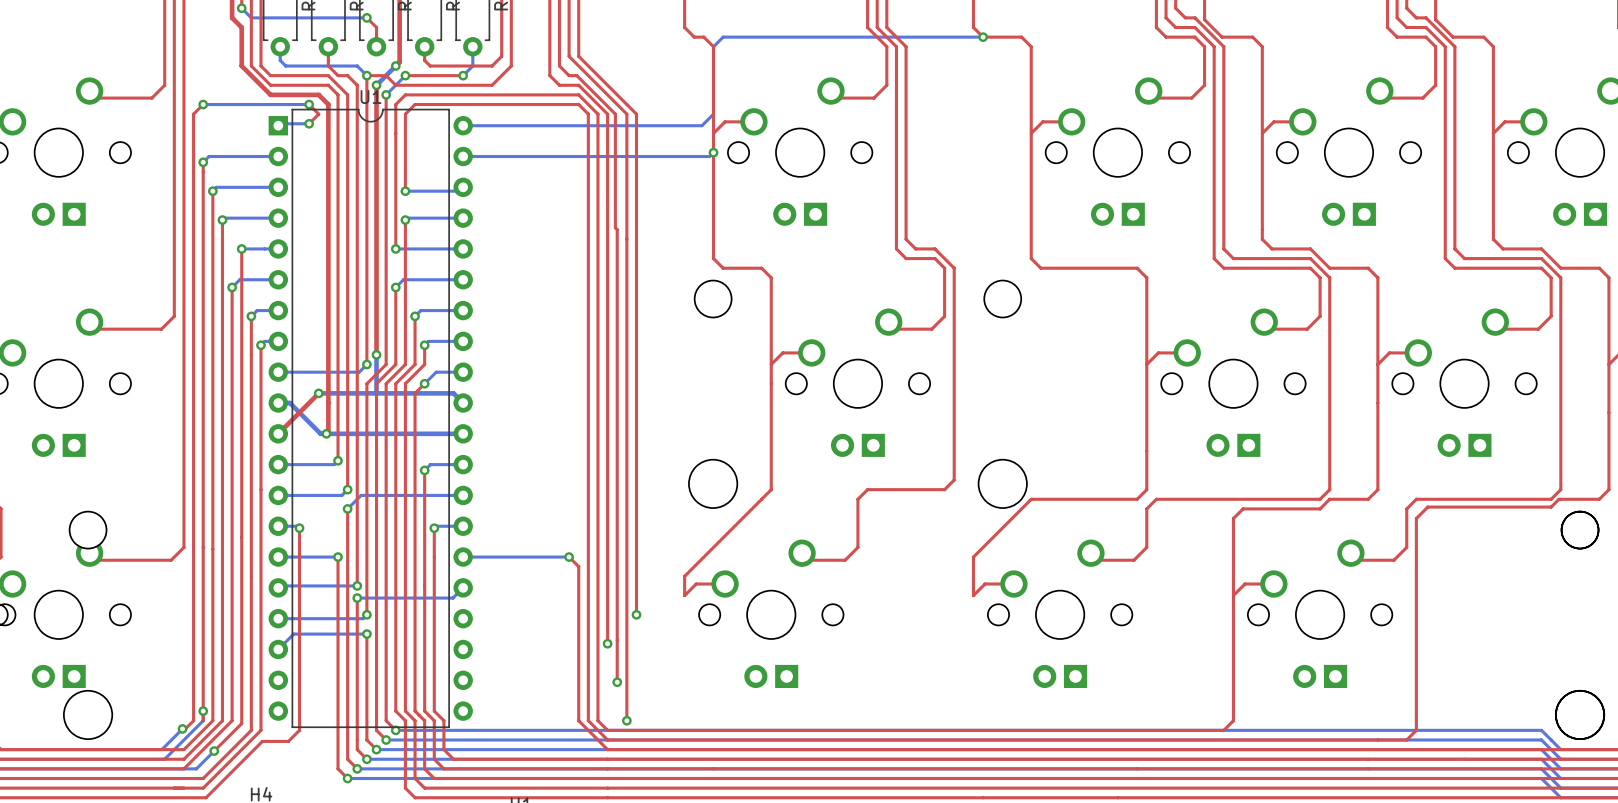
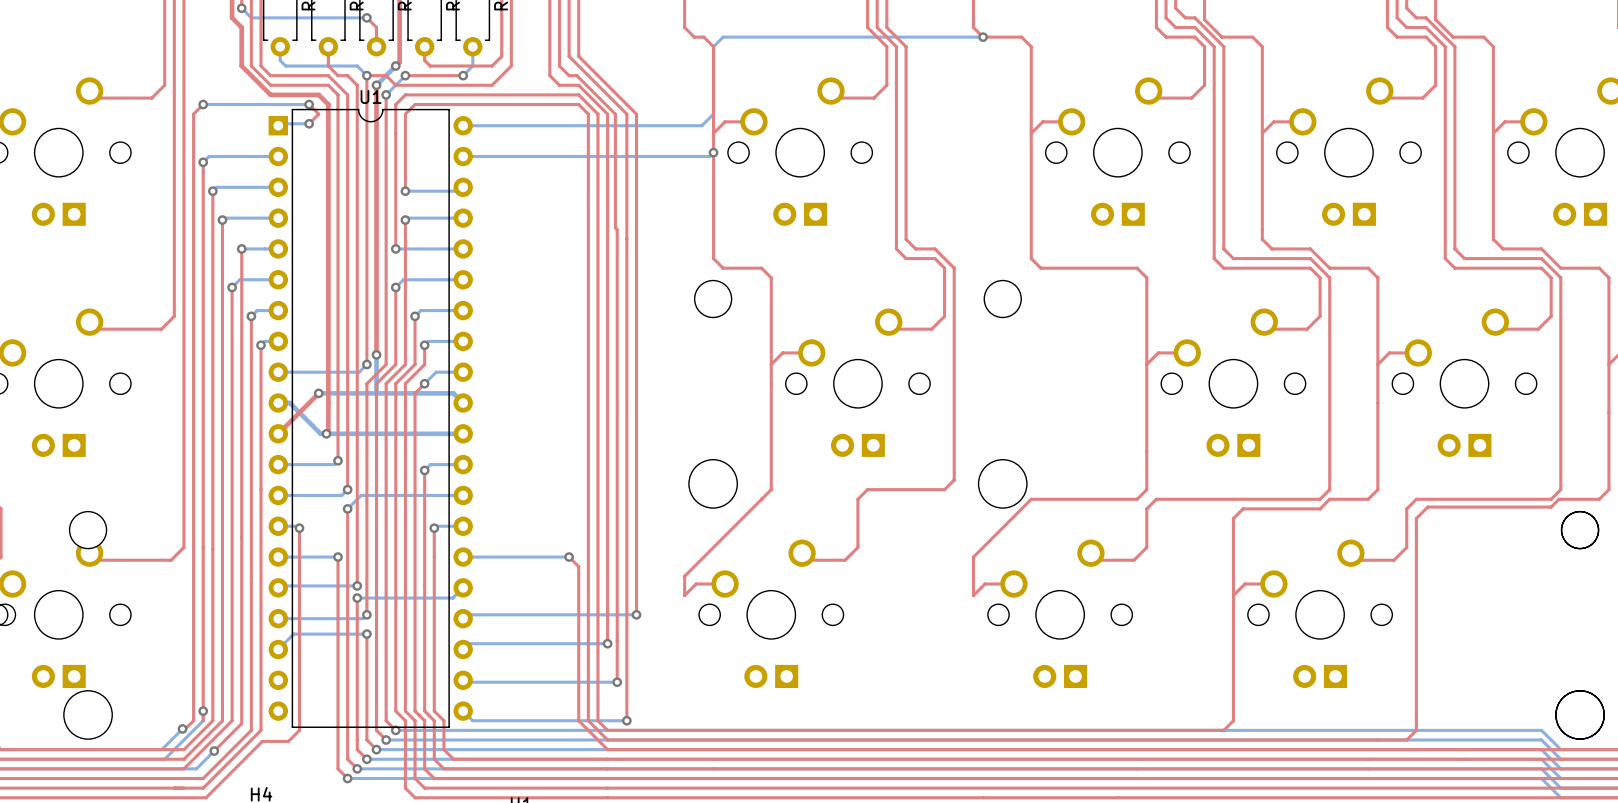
bottom track: none -> (636, 614) (467, 614) (463, 618)
bottom track: none -> (607, 643) (468, 643) (463, 649)
bottom track: none -> (463, 680) (465, 682) (617, 682)
bottom track: none -> (463, 711) (472, 720) (626, 720)

